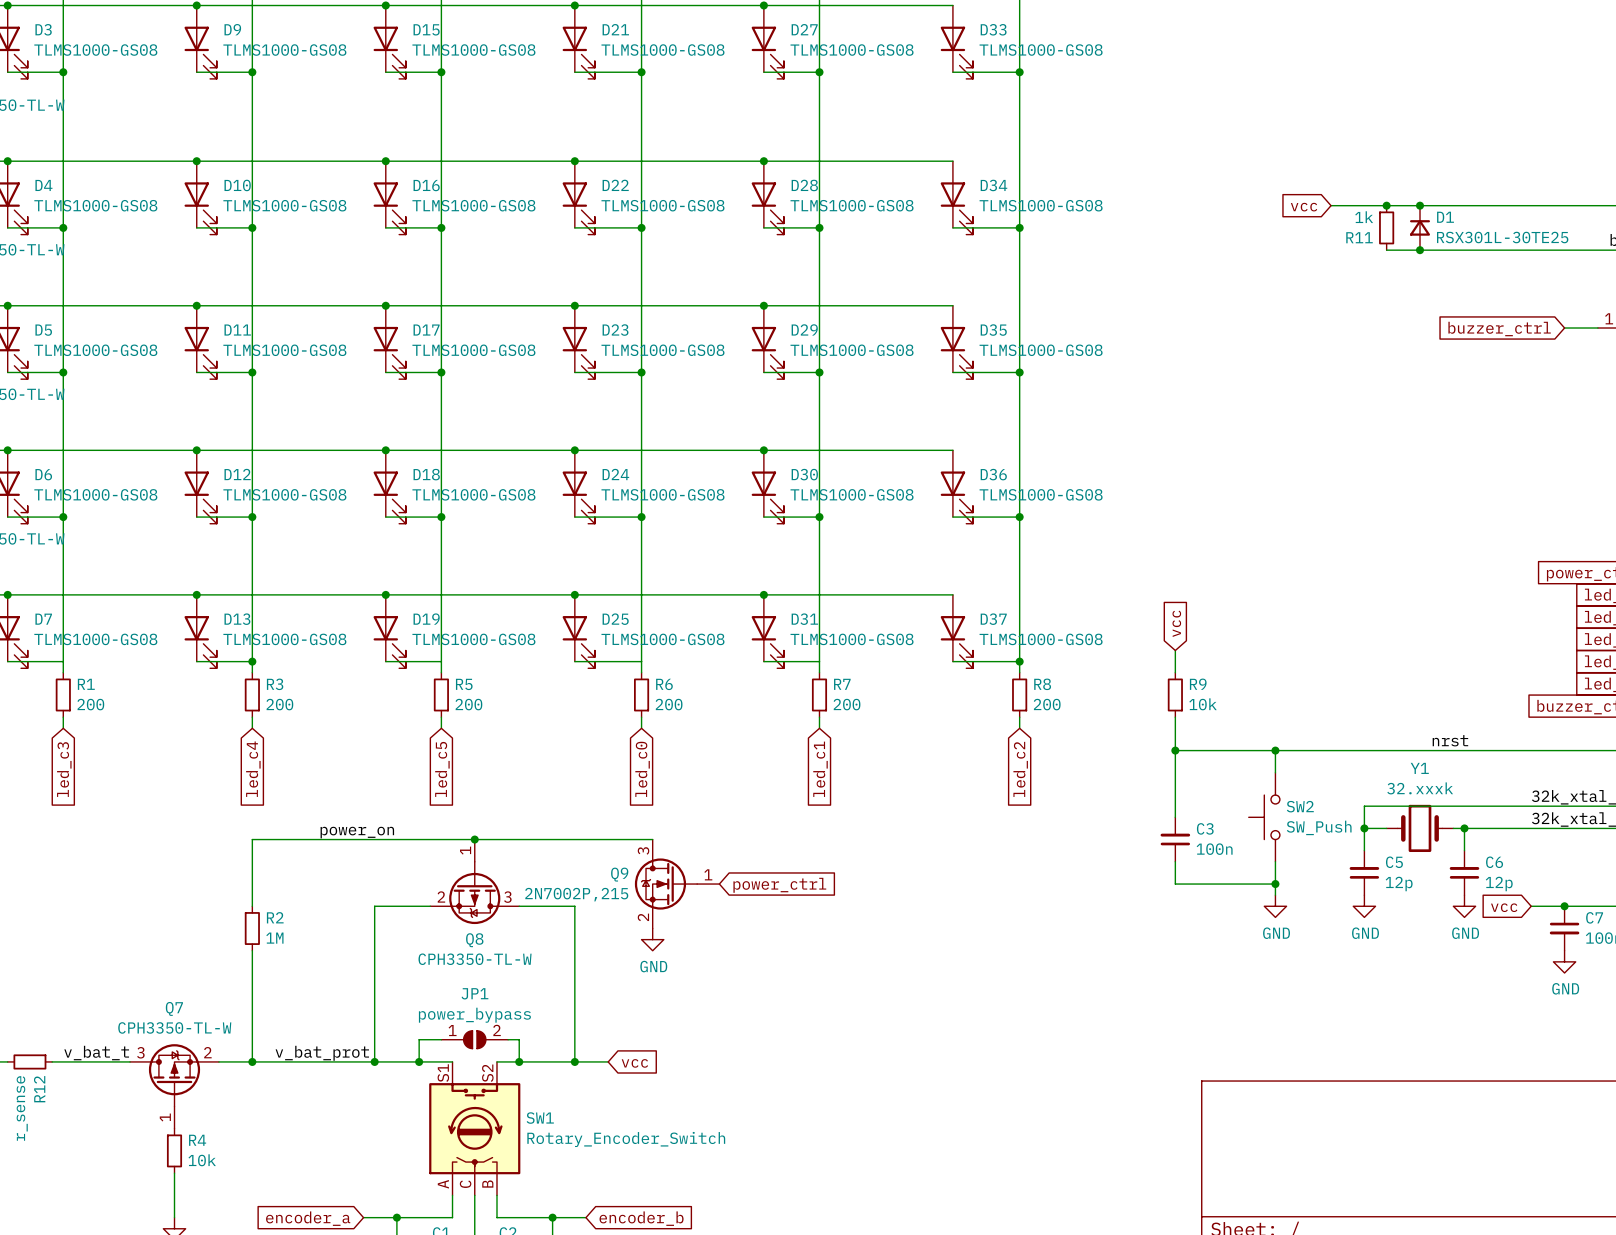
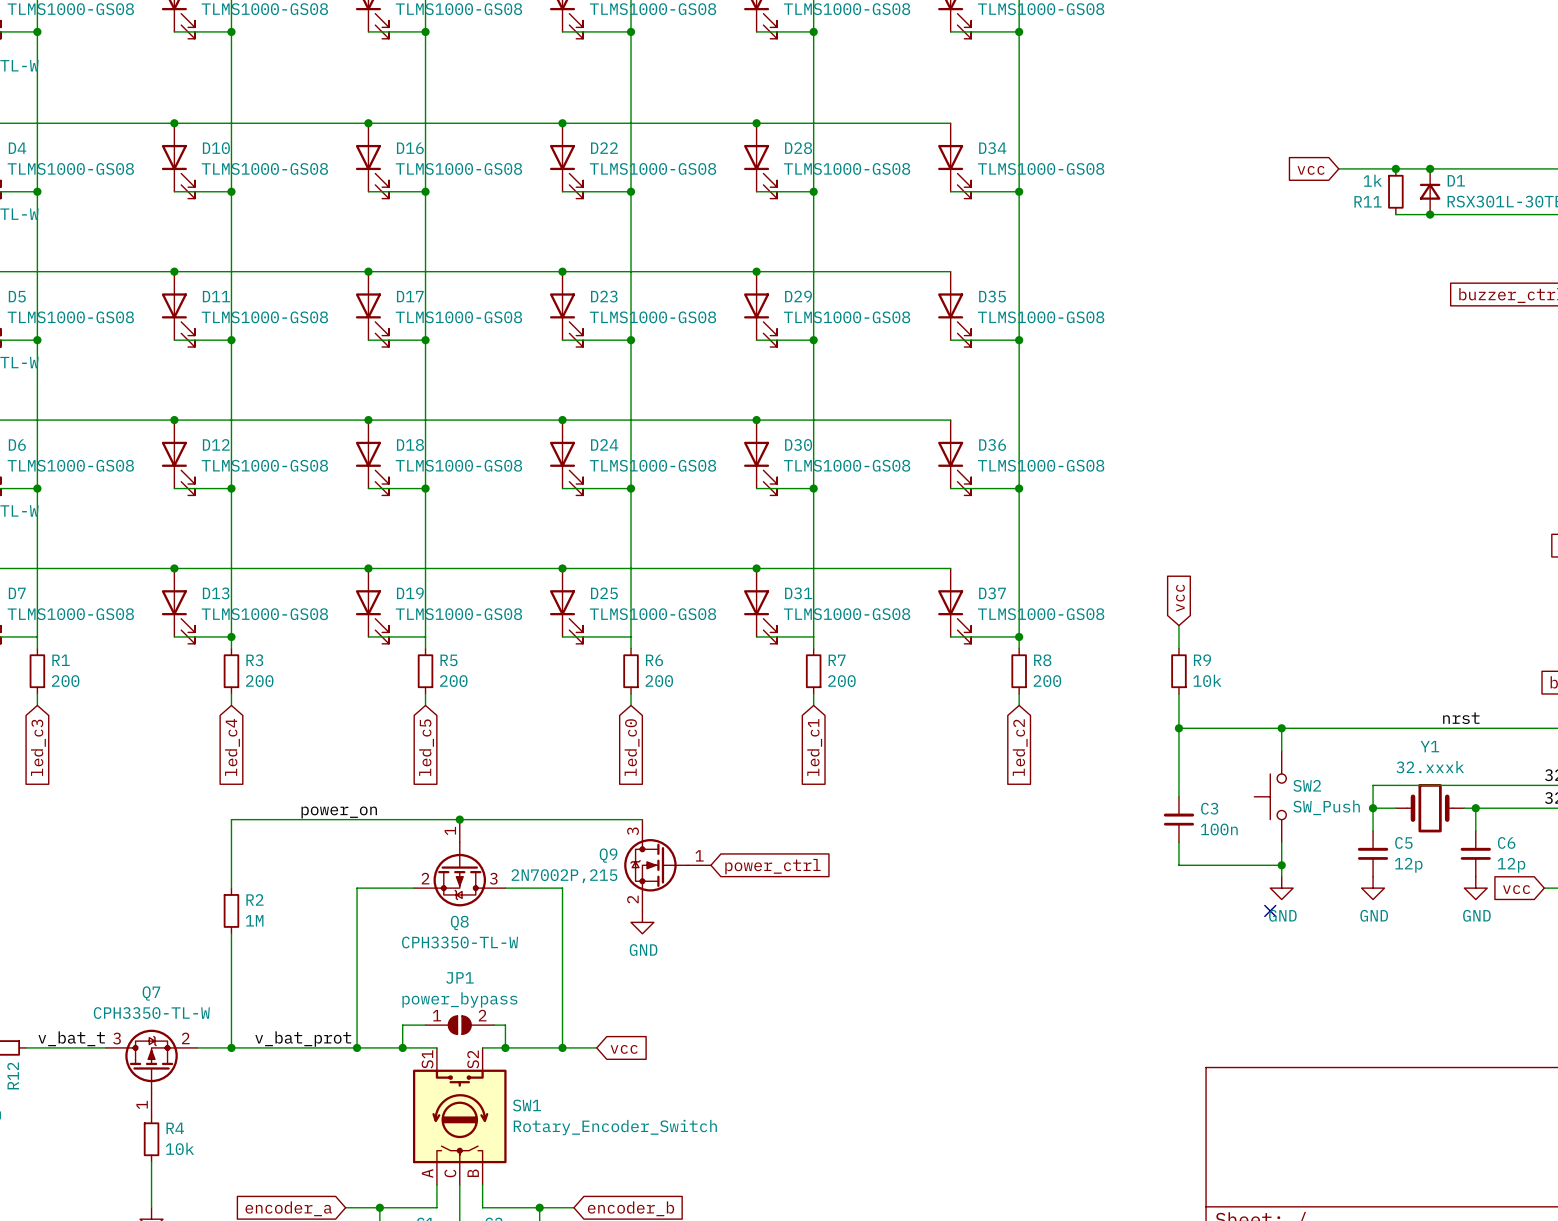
no-connect mark: none -> (1270, 910)

